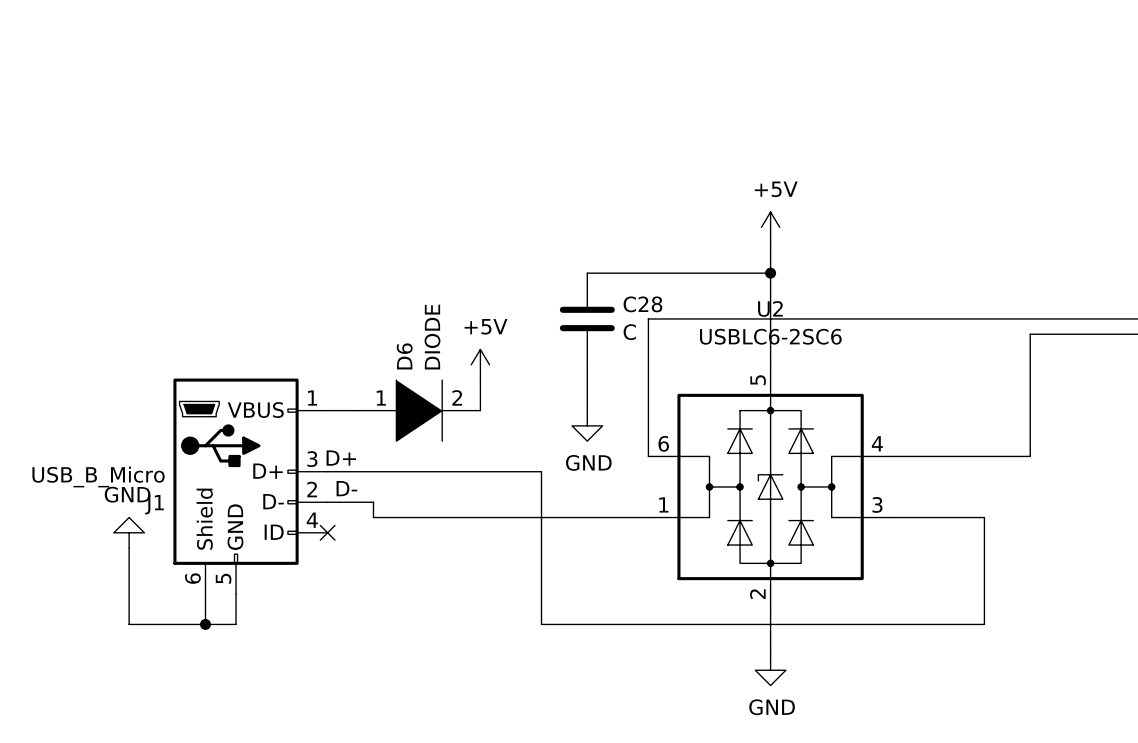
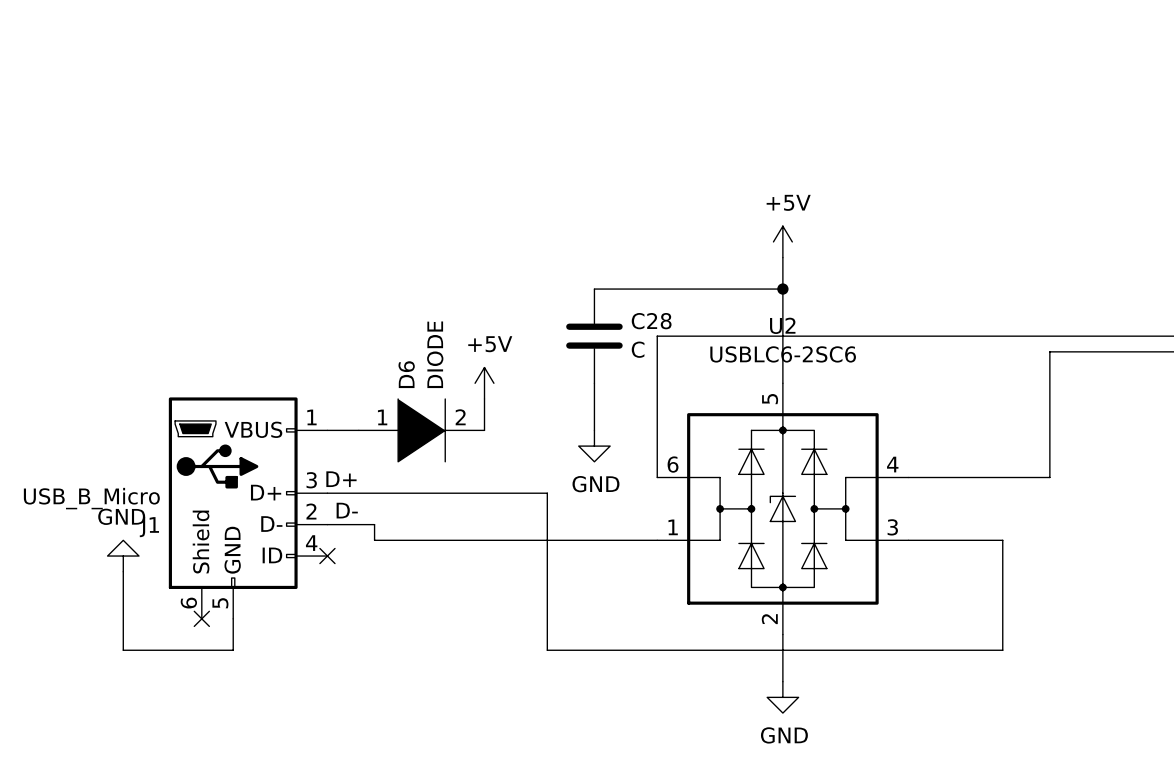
wire: (205, 593) (205, 624) -> none
no-connect mark: none -> (201, 618)
junction: (205, 624) -> none

